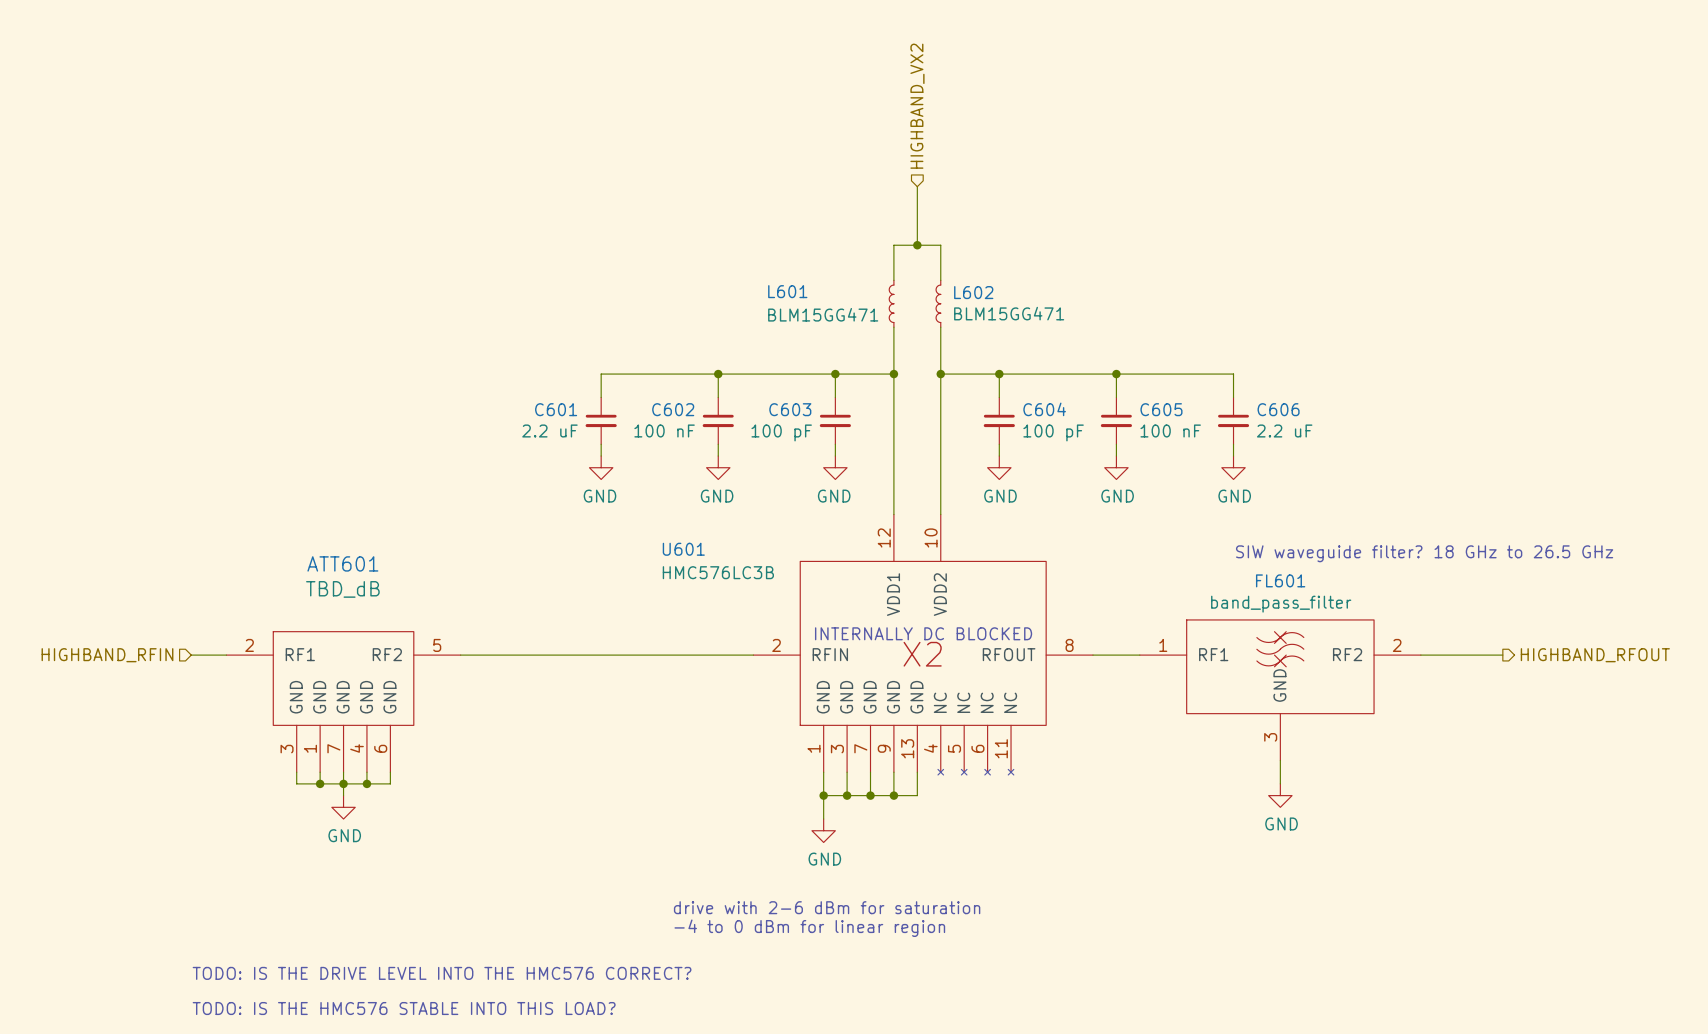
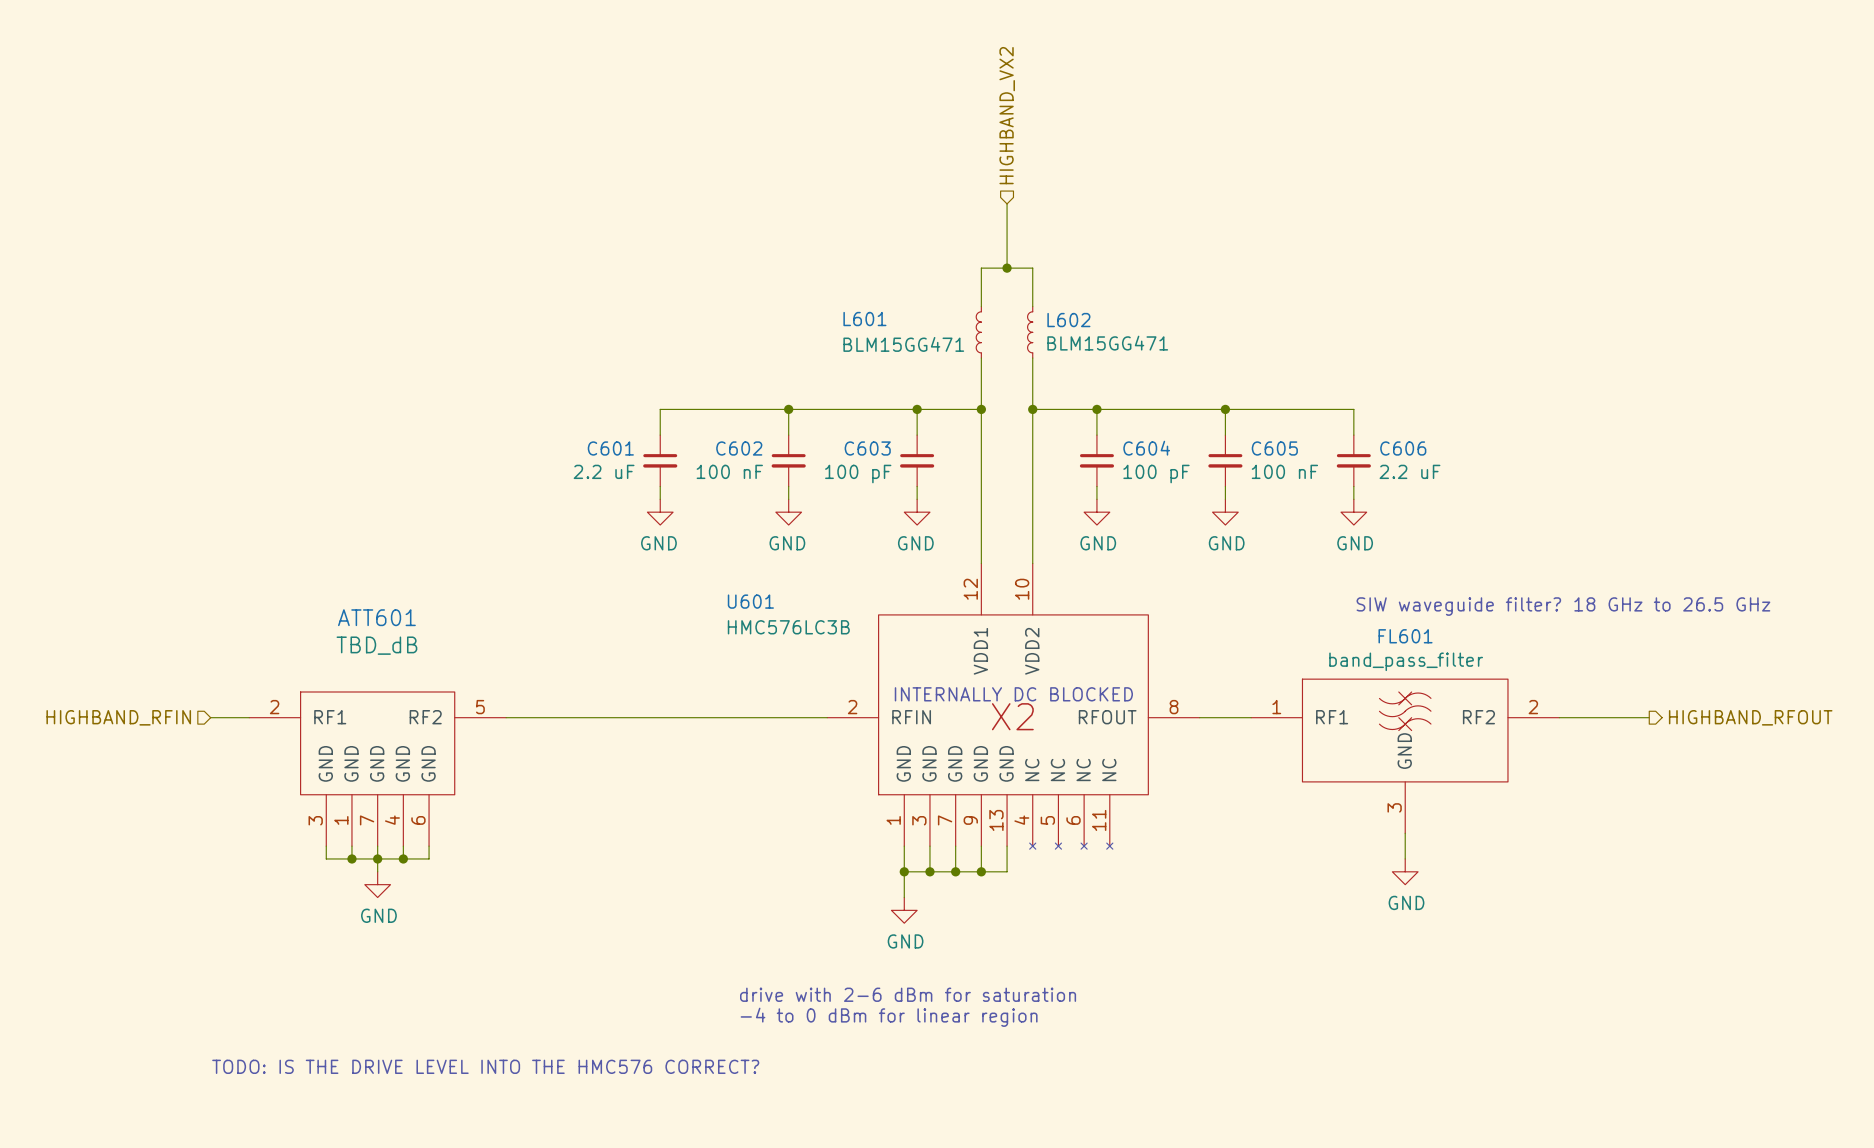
text: TODO: IS THE HMC576 STABLE INTO THIS LOAD? (404, 1008) -> none

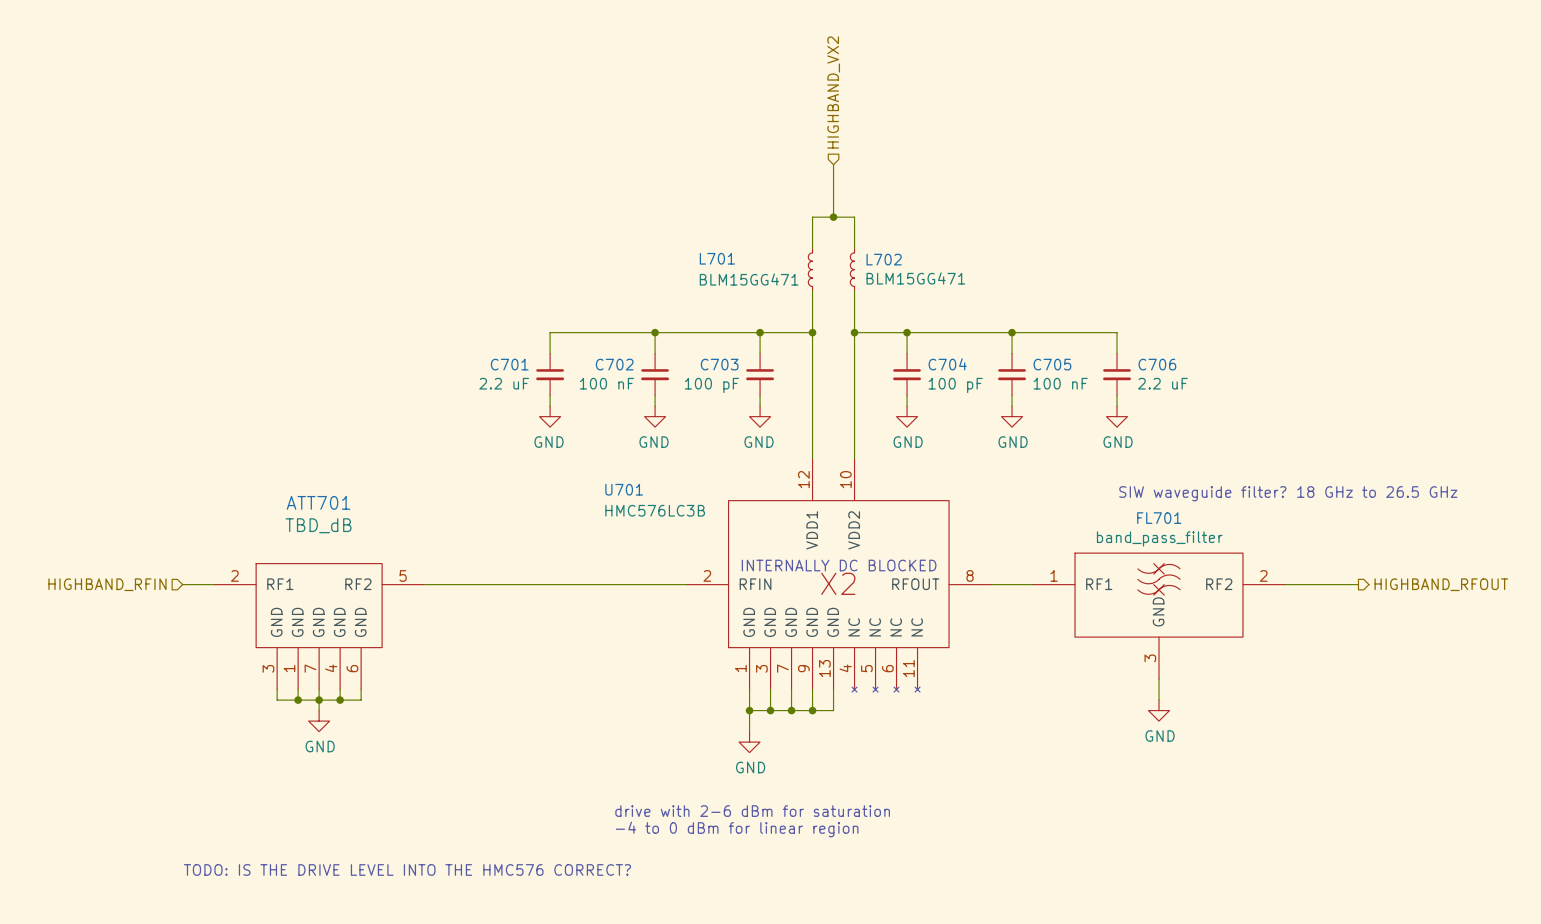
L601 name: L601 (864, 319) -> L701 (717, 258)
L602 name: L602 (1068, 320) -> L702 (884, 259)
C601 name: C601 (610, 448) -> C701 (509, 364)
C602 name: C602 (739, 448) -> C702 (614, 364)
C603 name: C603 (867, 448) -> C703 (719, 364)
C604 name: C604 (1146, 448) -> C704 (947, 364)
C605 name: C605 (1274, 448) -> C705 (1052, 364)
C606 name: C606 (1403, 448) -> C706 (1157, 364)
U601 name: U601 (750, 601) -> U701 (624, 489)
ATT601 name: ATT601 (376, 617) -> ATT701 (318, 502)
FL601 name: FL601 (1405, 636) -> FL701 (1159, 518)

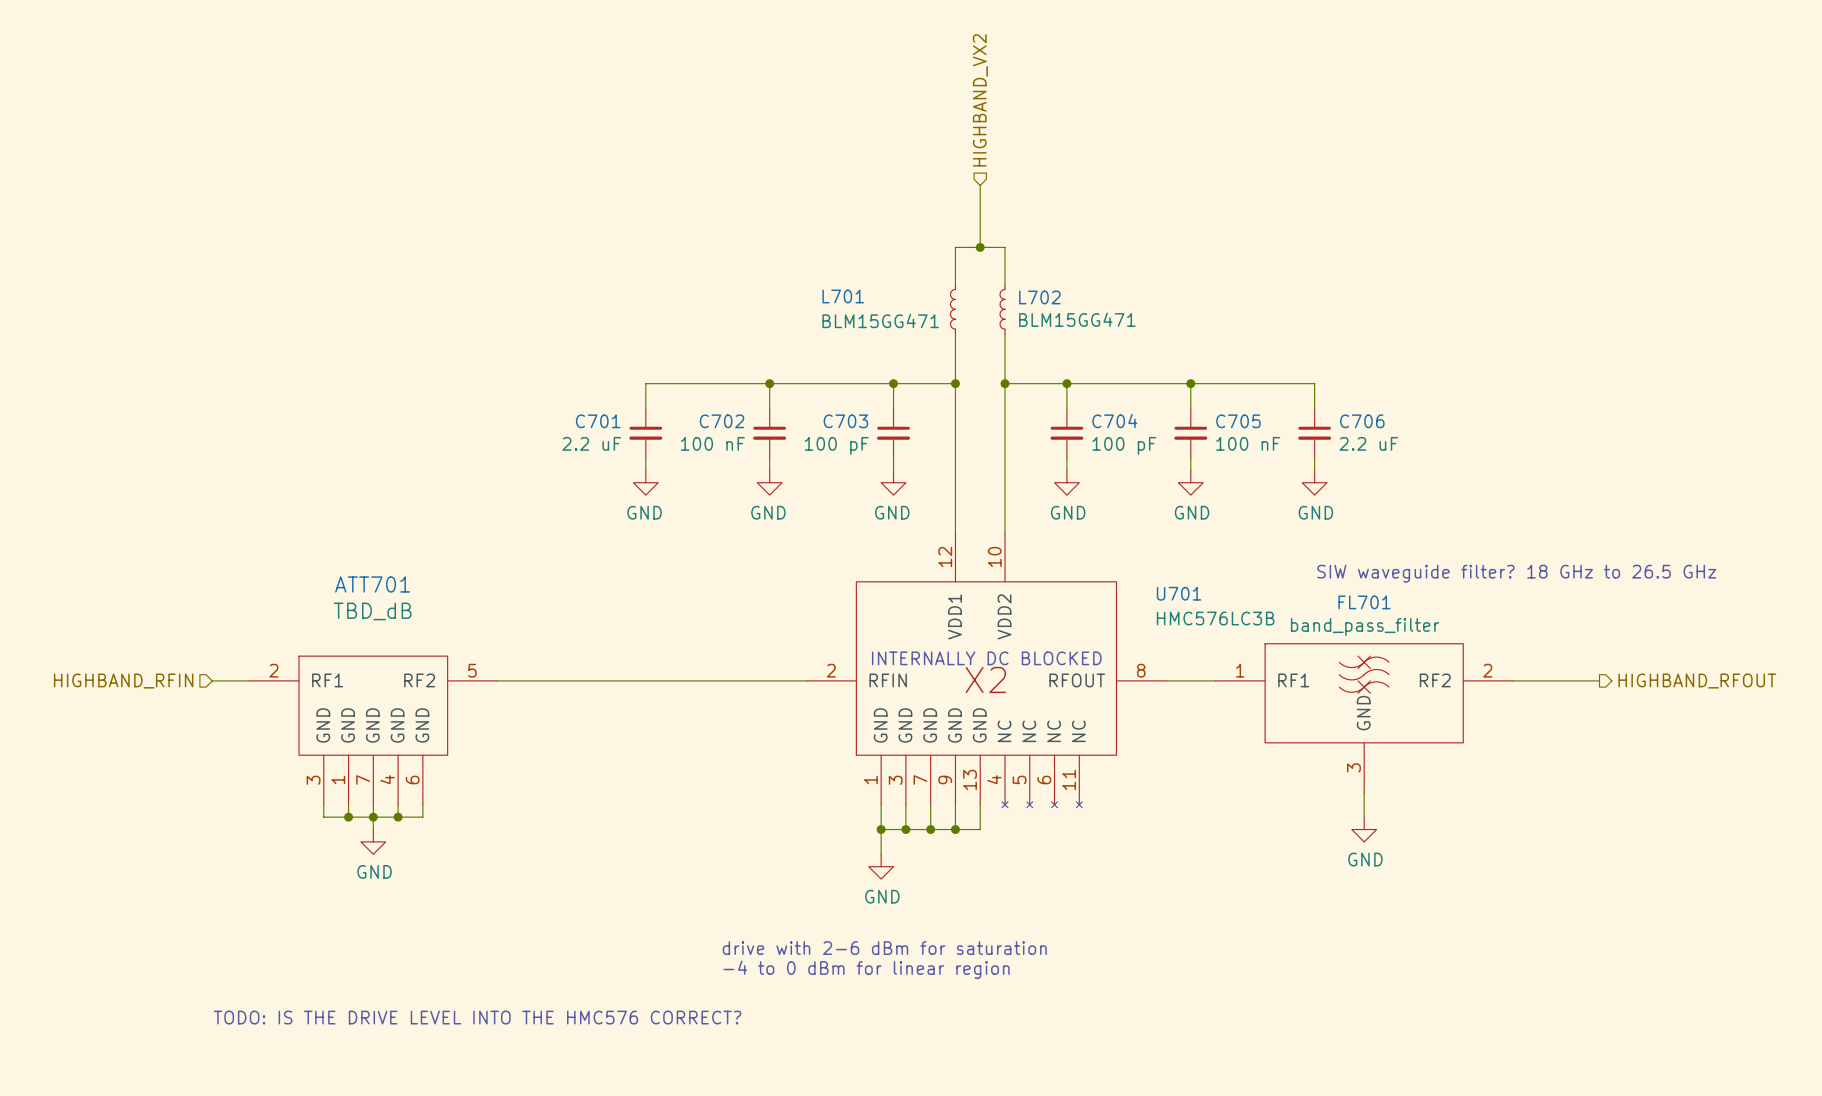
U701 name position: U701 (624, 489) -> U701 (1179, 593)
U701 value position: HMC576LC3B (655, 510) -> HMC576LC3B (1215, 618)

